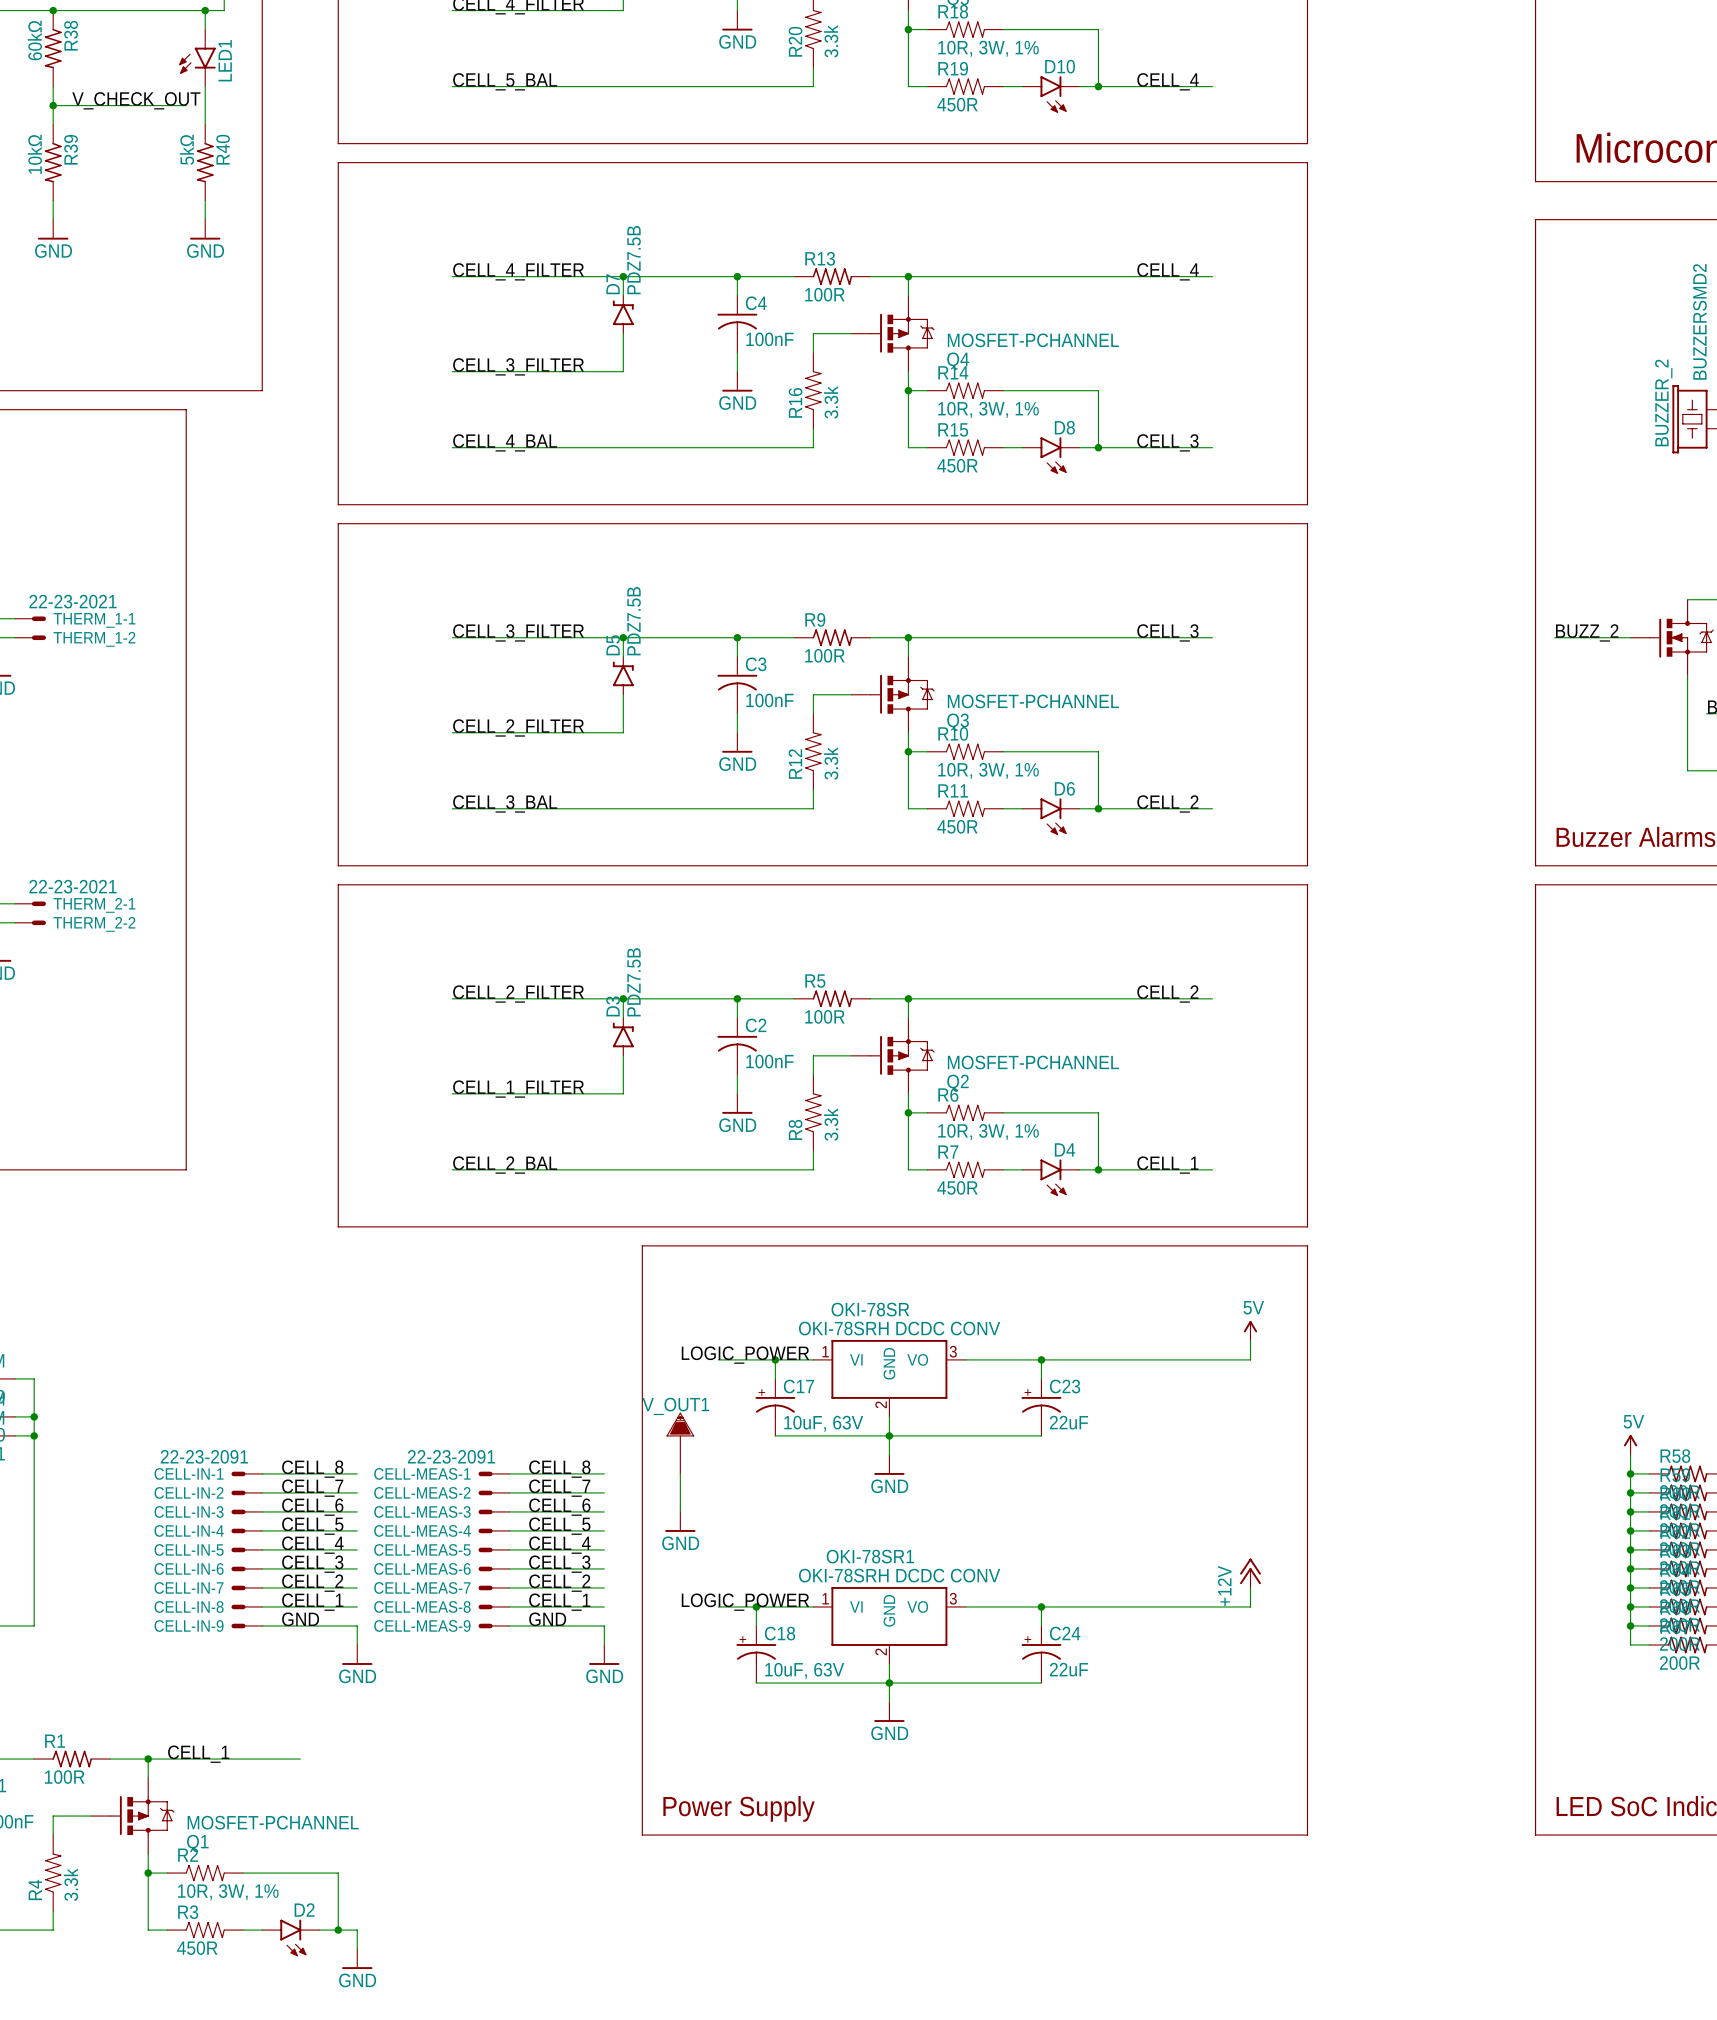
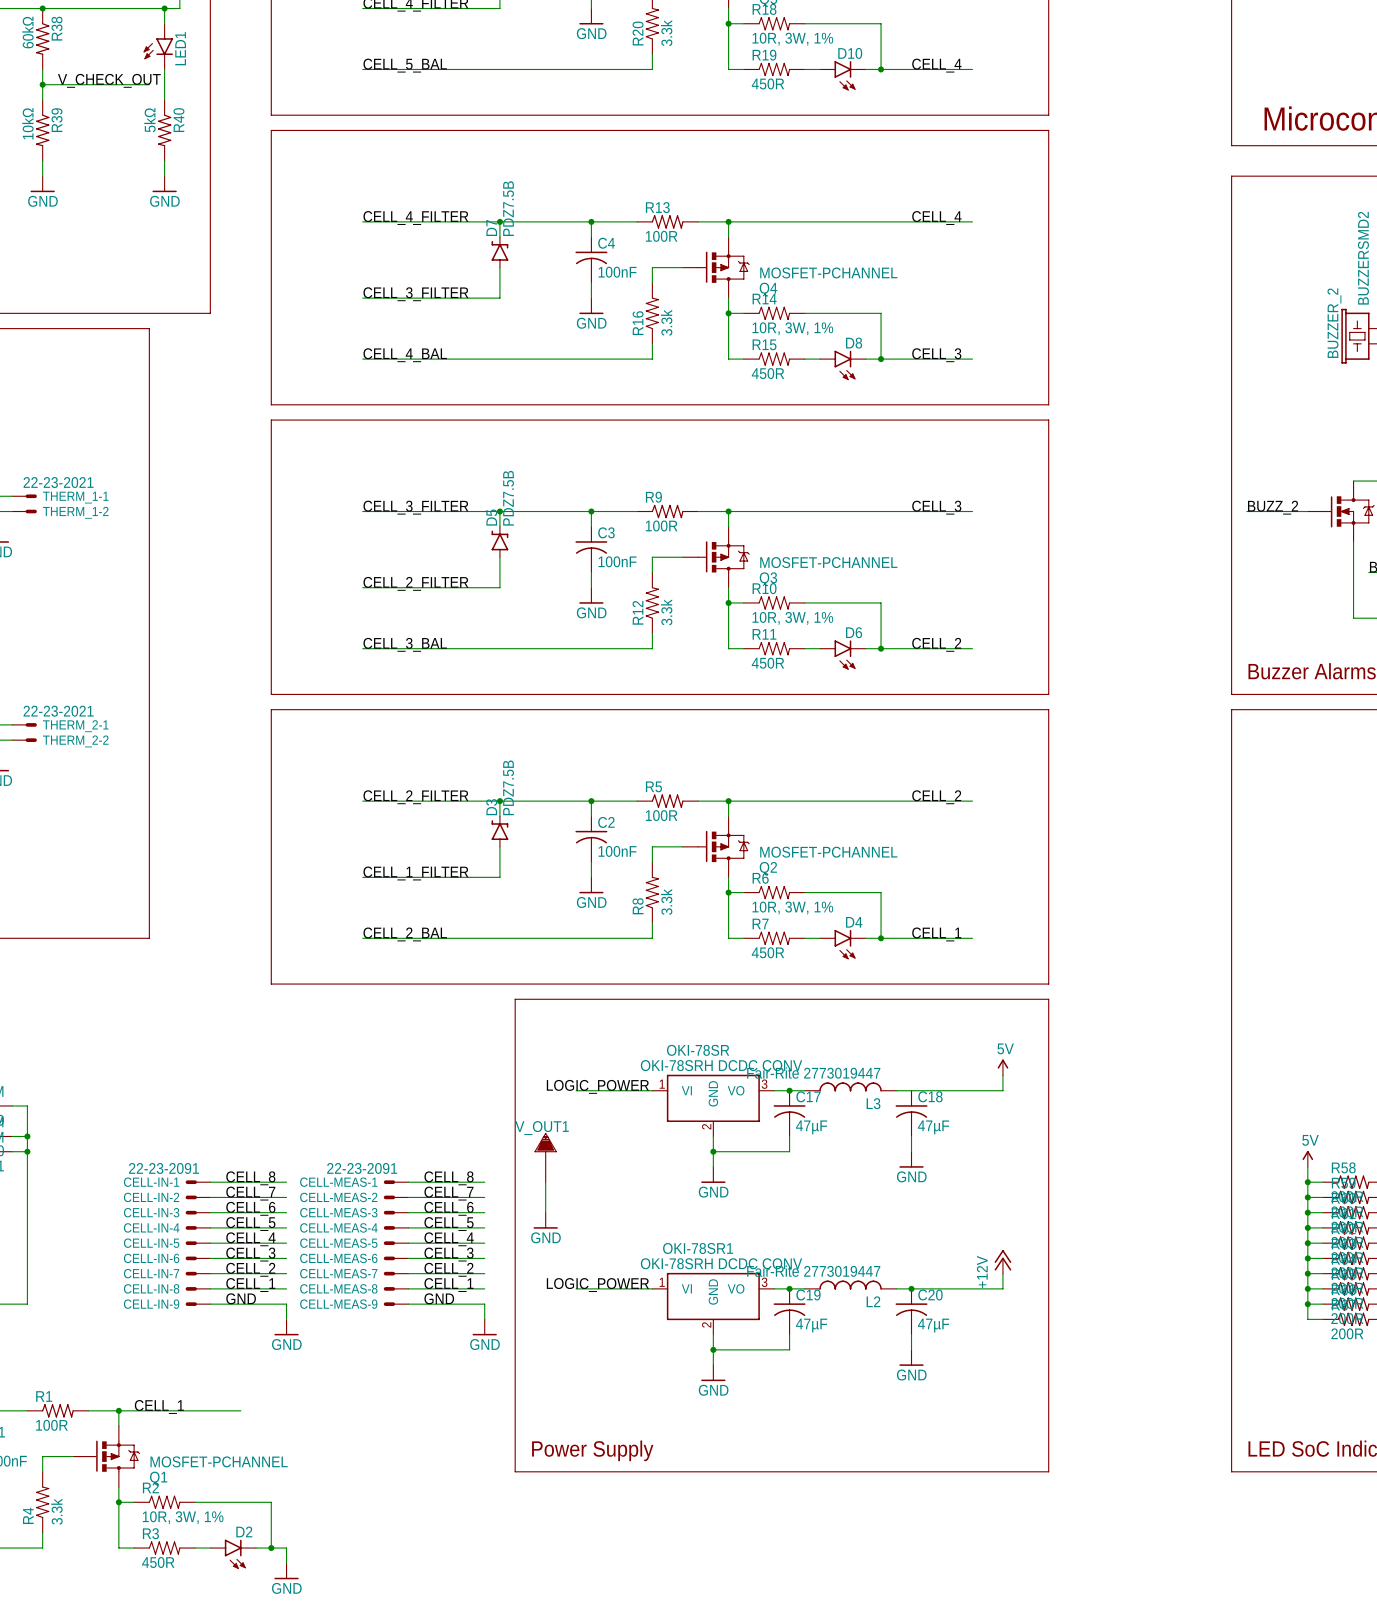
L3: none -> Fair-Rite 2773019447 (850, 1086)
wire: (775, 1359) (775, 1378) -> none
junction: (775, 1359) -> none
junction: none -> (789, 1090)
wire: (1003, 1359) (1117, 1359) -> none
wire: (1041, 1359) (1041, 1378) -> (911, 1136) (911, 1151)
junction: (1041, 1359) -> none
C17 symbol: [755, 1378, 796, 1436] -> [773, 1090, 806, 1137]
C23: 22uF (1041, 1407) -> none
C17 value: 10uF, 63V (823, 1423) -> 47µF (811, 1127)
wire: (775, 1435) (889, 1435) -> none
wire: (984, 1435) (1041, 1435) -> (789, 1151) (789, 1136)
power symbol: none -> GND (911, 1159)
L2: none -> Fair-Rite 2773019447 (850, 1285)
wire: (756, 1606) (756, 1625) -> none
junction: (756, 1606) -> none
junction: none -> (789, 1288)
wire: (1003, 1606) (1117, 1606) -> none
wire: (1041, 1606) (1041, 1625) -> (911, 1334) (911, 1349)
junction: (1041, 1606) -> none
junction: none -> (911, 1288)
C18 symbol: [736, 1625, 777, 1684] -> [895, 1090, 928, 1137]
C19: none -> 47µF (789, 1311)
C20: none -> 47µF (911, 1311)
C24: 22uF (1041, 1654) -> none
C18 value: 10uF, 63V (804, 1670) -> 47µF (933, 1127)
wire: (756, 1683) (889, 1683) -> none
wire: (984, 1683) (1041, 1683) -> (789, 1349) (789, 1334)
power symbol: none -> GND (911, 1357)

